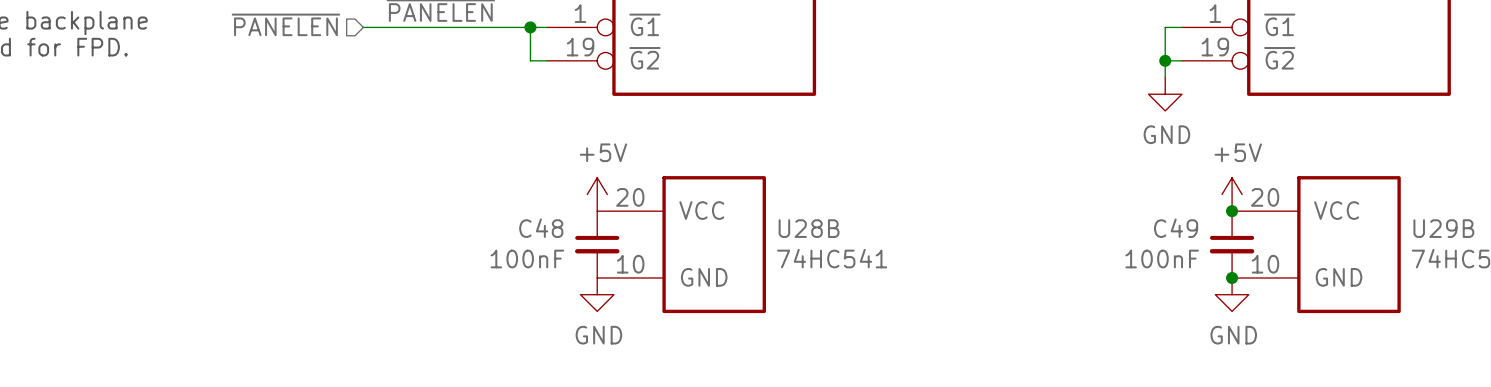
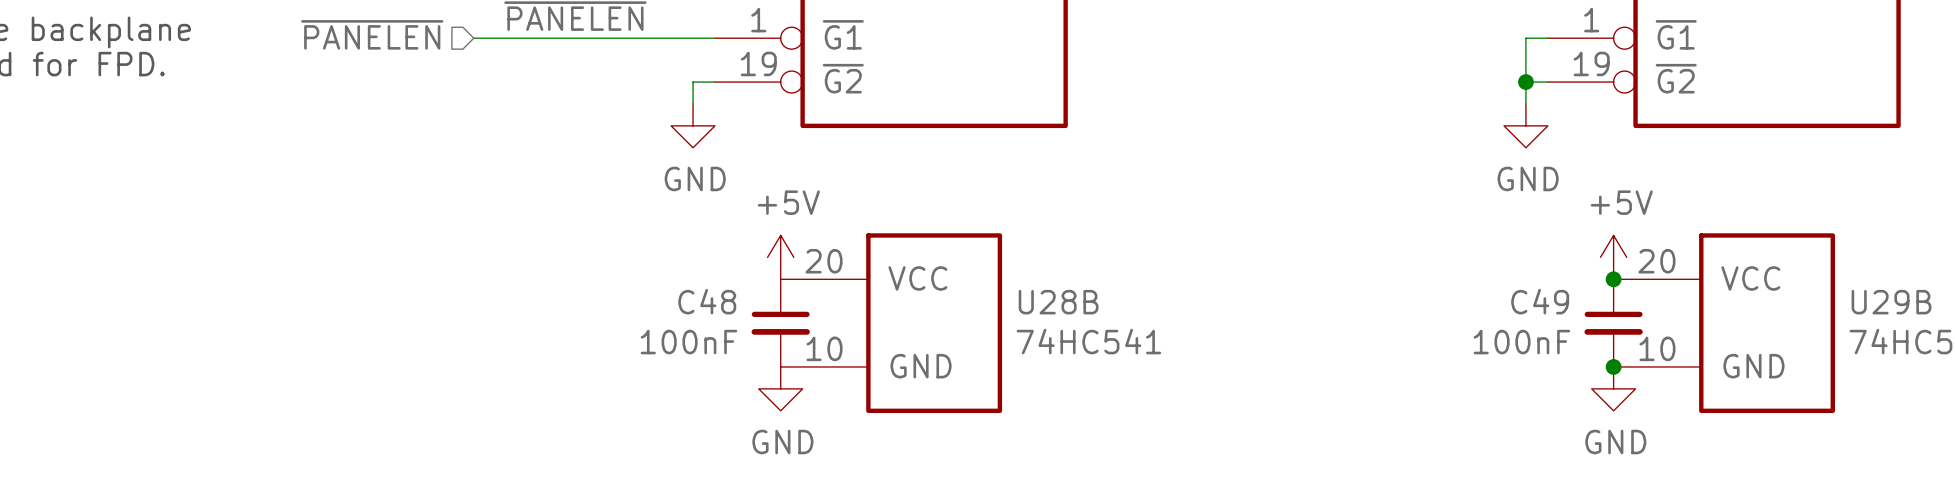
wire: (530, 27) (530, 60) -> (693, 103) (693, 82)
junction: (530, 27) -> none
power symbol: none -> GND (693, 125)

